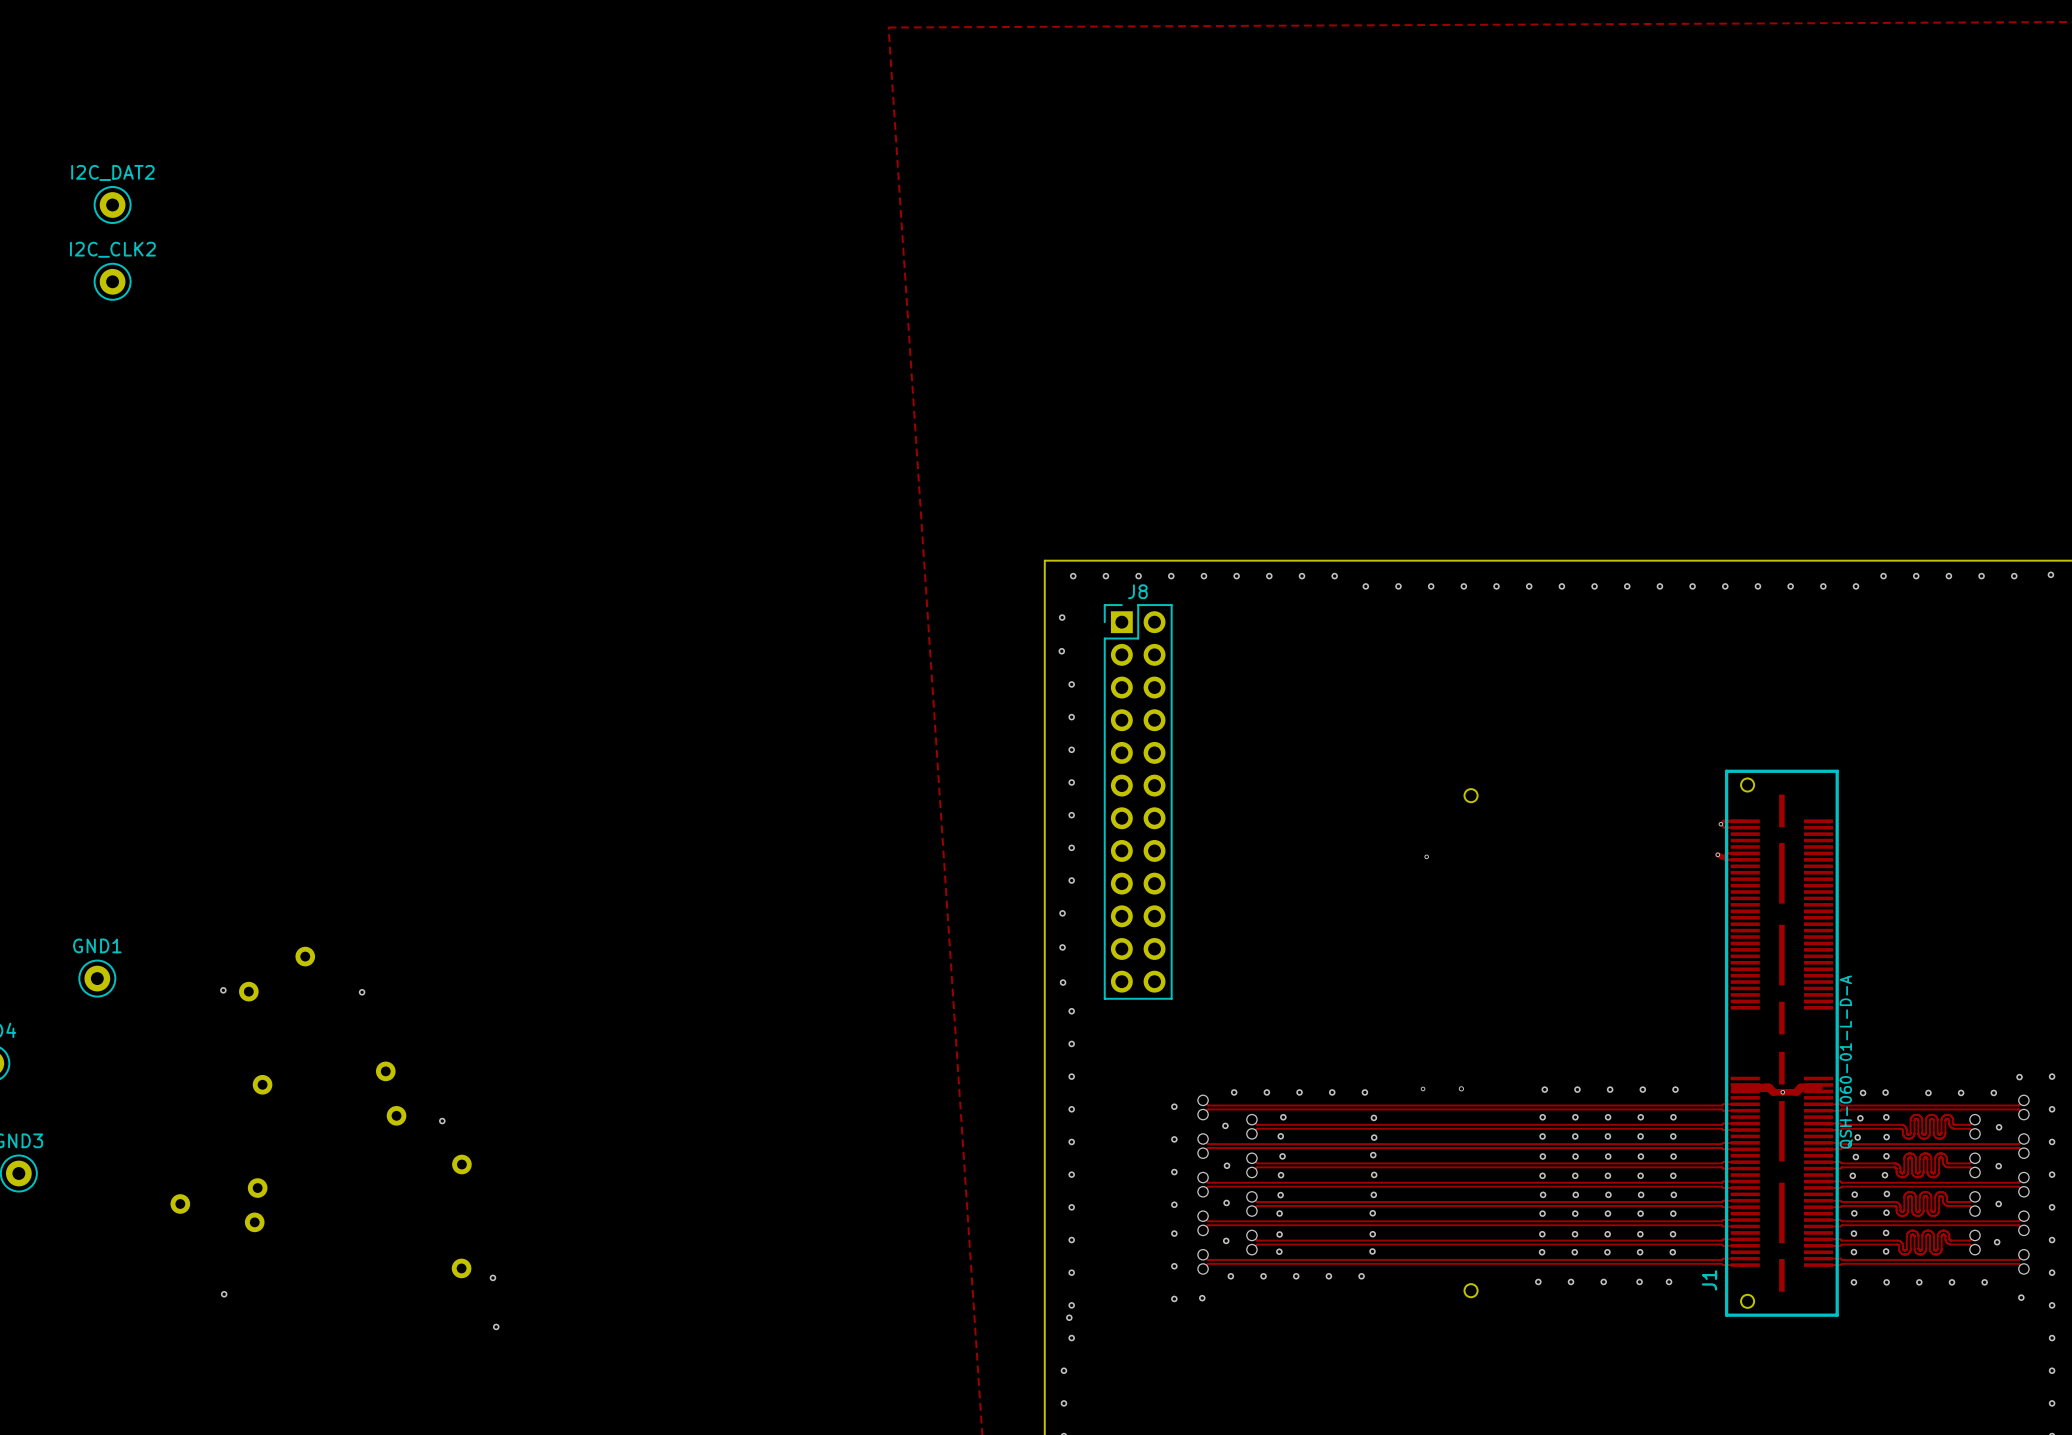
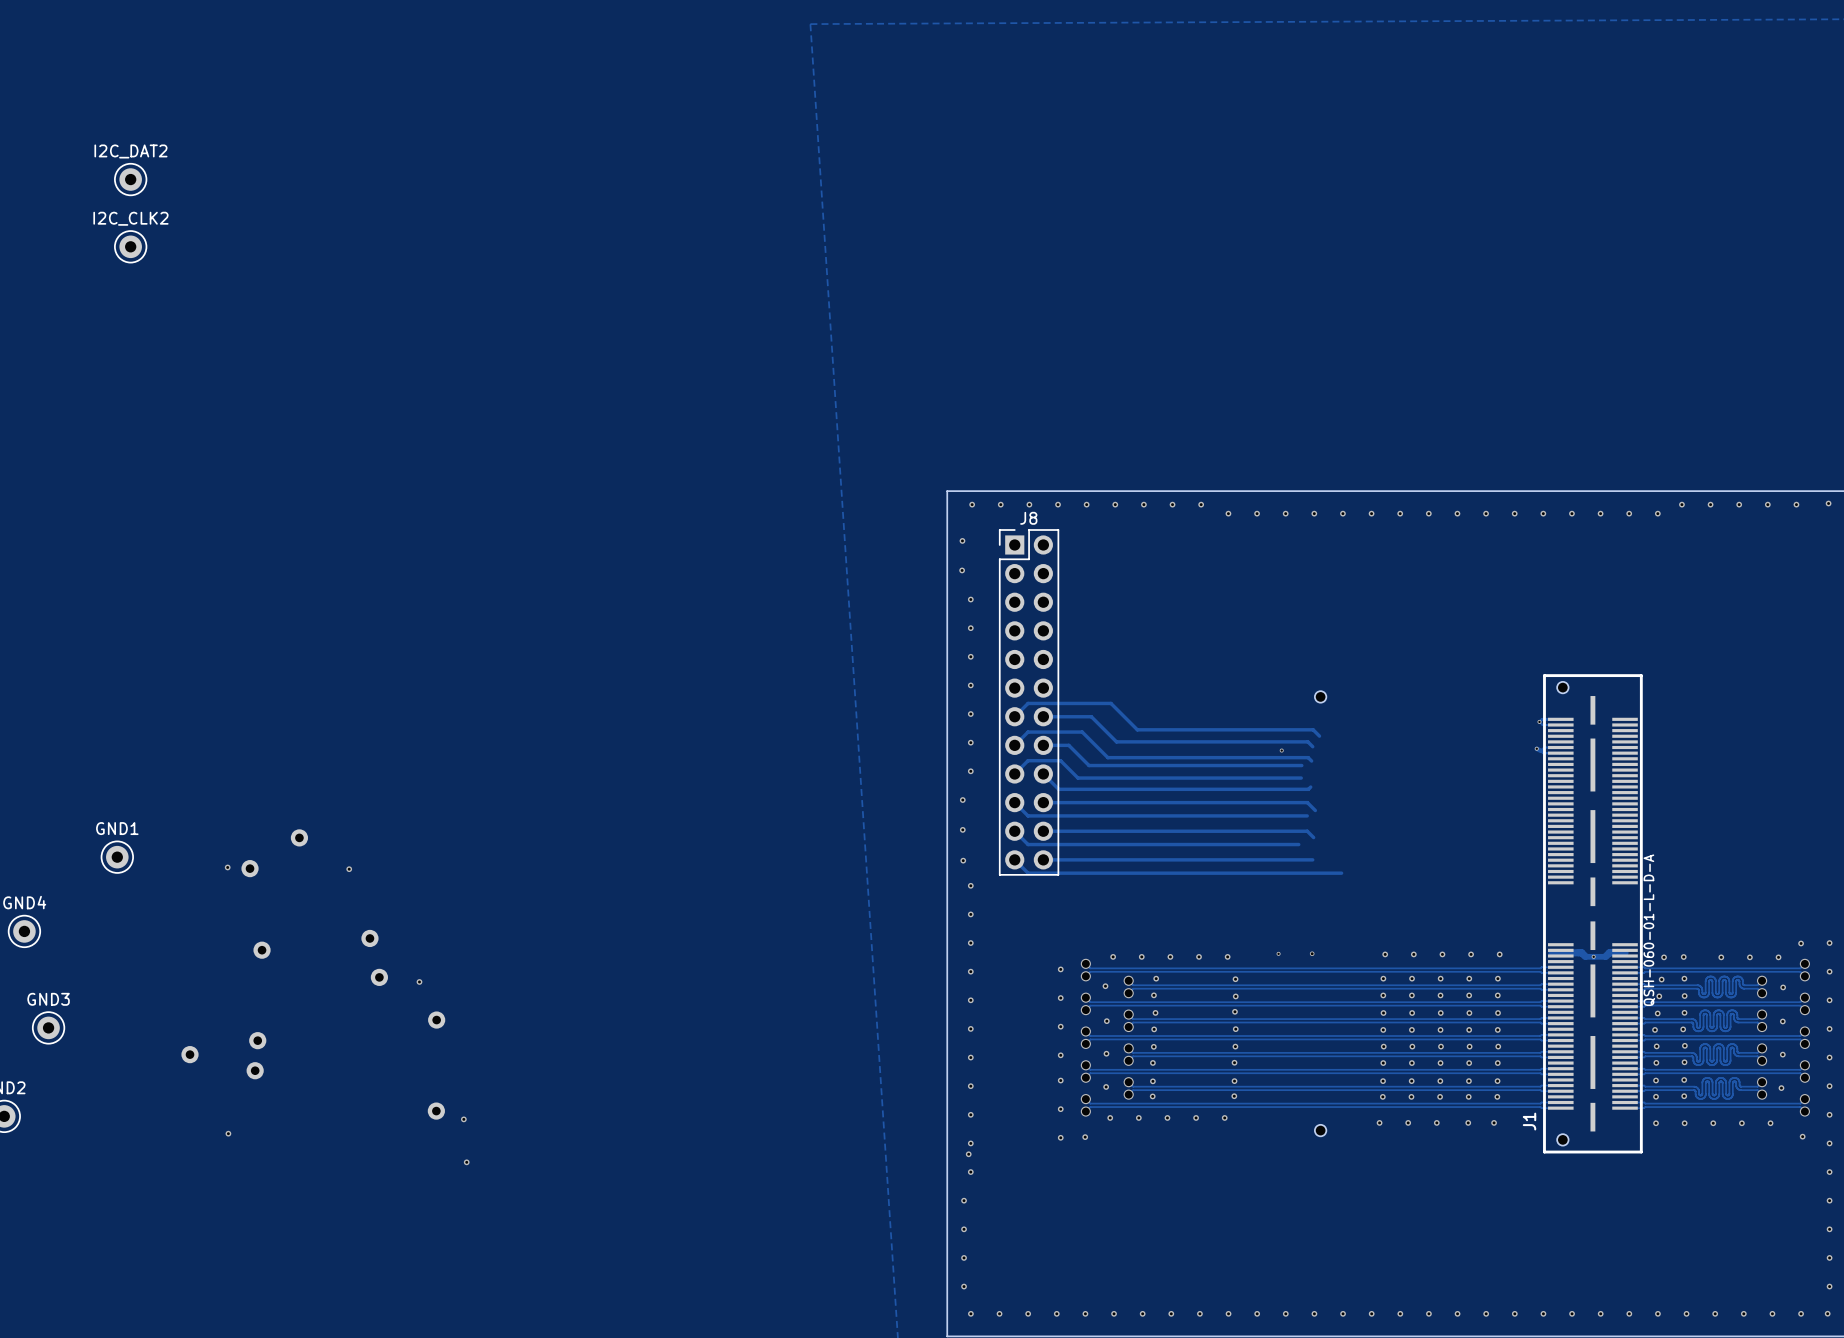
track: none -> (1014, 716) (1028, 703) (1110, 703) (1137, 729) (1313, 729) (1319, 736)
track: none -> (1043, 716) (1091, 716) (1116, 741) (1307, 741) (1312, 746)
track: none -> (1014, 745) (1028, 732) (1082, 732) (1107, 757) (1308, 757) (1311, 761)
track: none -> (1043, 745) (1068, 745) (1089, 765) (1301, 765)
track: none -> (1014, 773) (1028, 760) (1060, 760) (1077, 778) (1301, 778)
track: none -> (1043, 773) (1058, 789) (1308, 789) (1310, 787)
track: none -> (1014, 802) (1028, 815) (1307, 815)
track: none -> (1043, 802) (1307, 802) (1315, 810)
track: none -> (1014, 831) (1028, 844) (1298, 844)
track: none -> (1043, 831) (1307, 831) (1313, 837)
track: none -> (1014, 859) (1028, 873) (1341, 873)
track: none -> (1043, 859) (1312, 859)

